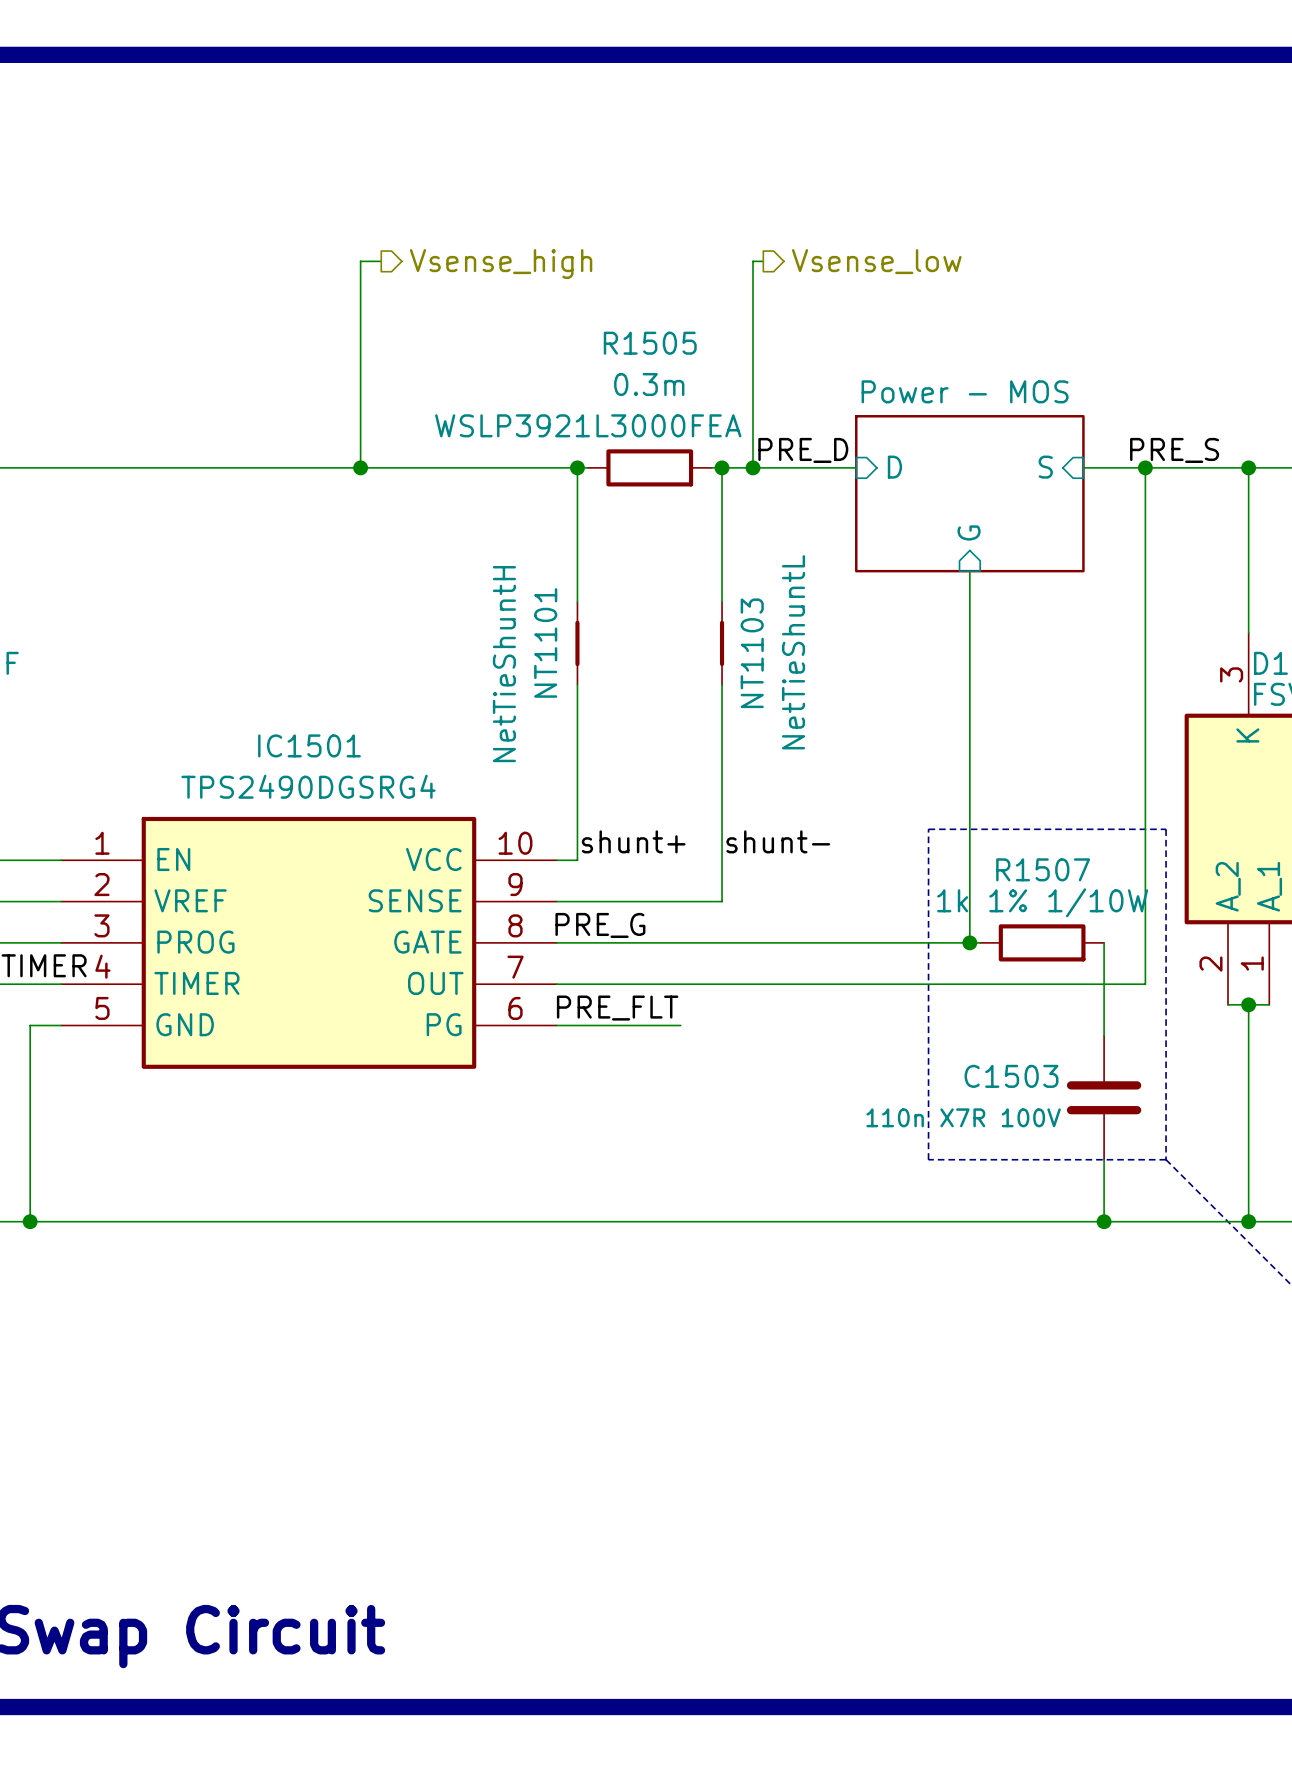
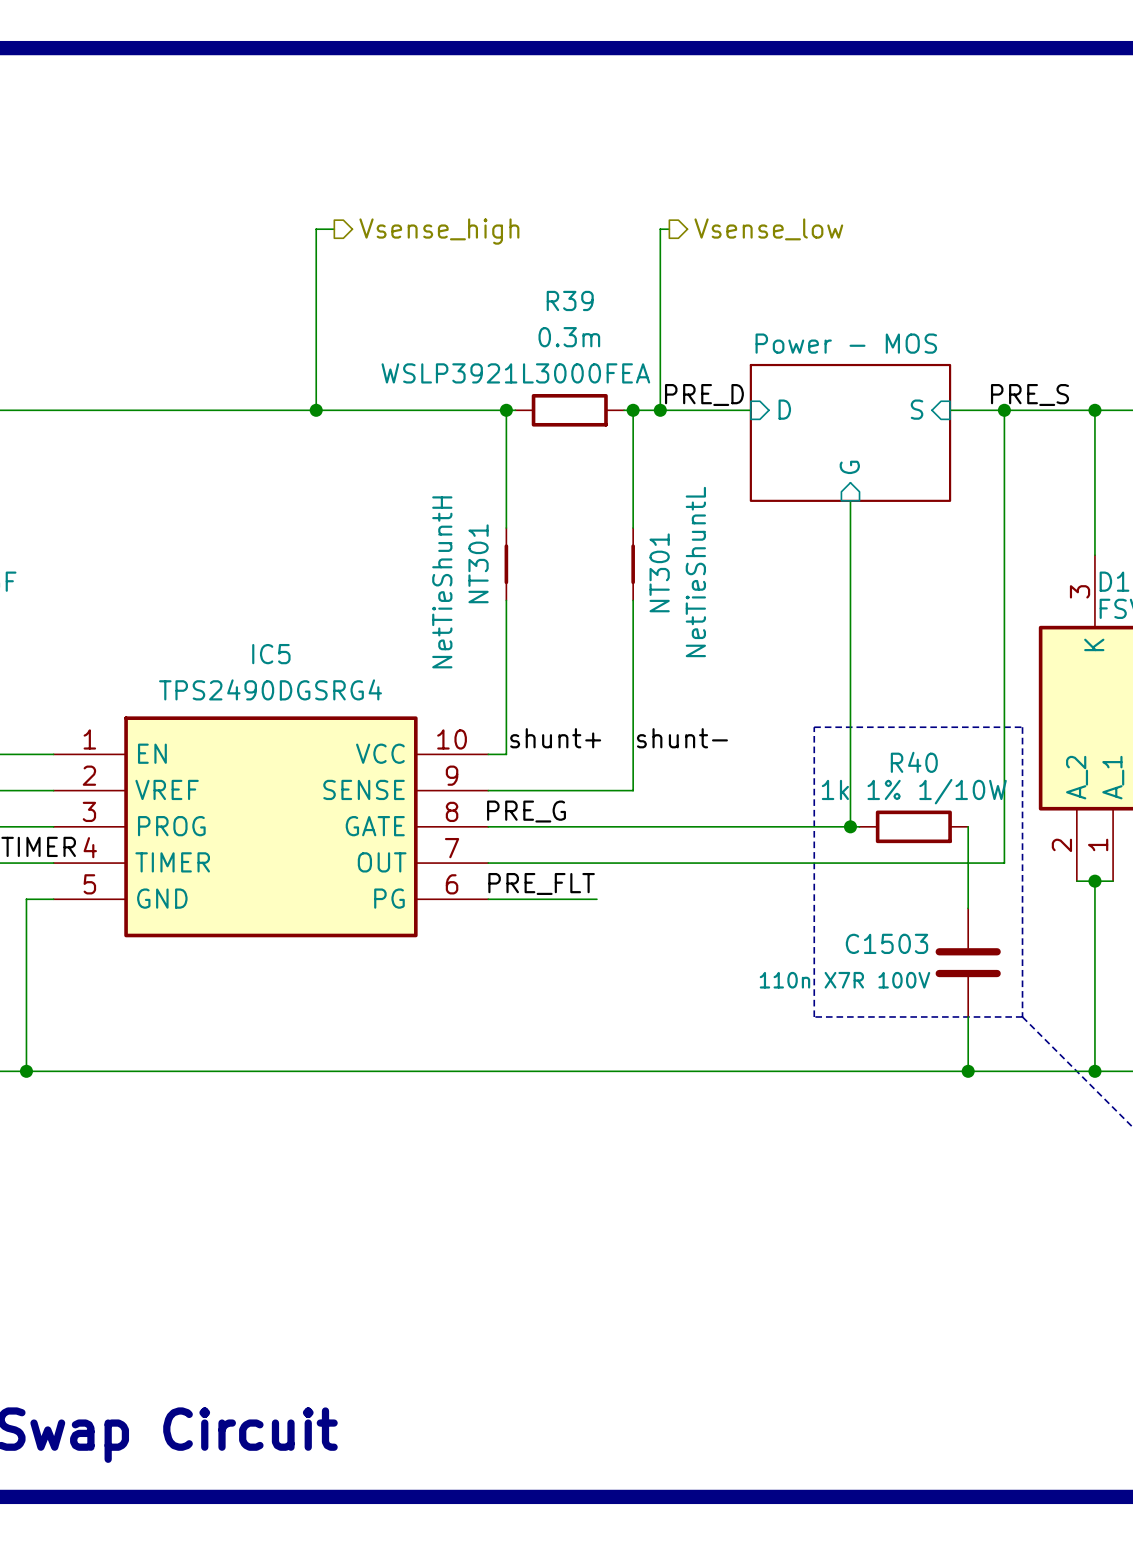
R1505 name: R1505 (650, 343) -> R39 (570, 300)
NT1101 name: NT1101 (545, 642) -> NT301 (478, 563)
NT1103 name: NT1103 (752, 653) -> NT301 (659, 572)
IC1501 name: IC1501 (309, 745) -> IC5 (271, 654)
R1507 name: R1507 (1043, 869) -> R40 (914, 762)

